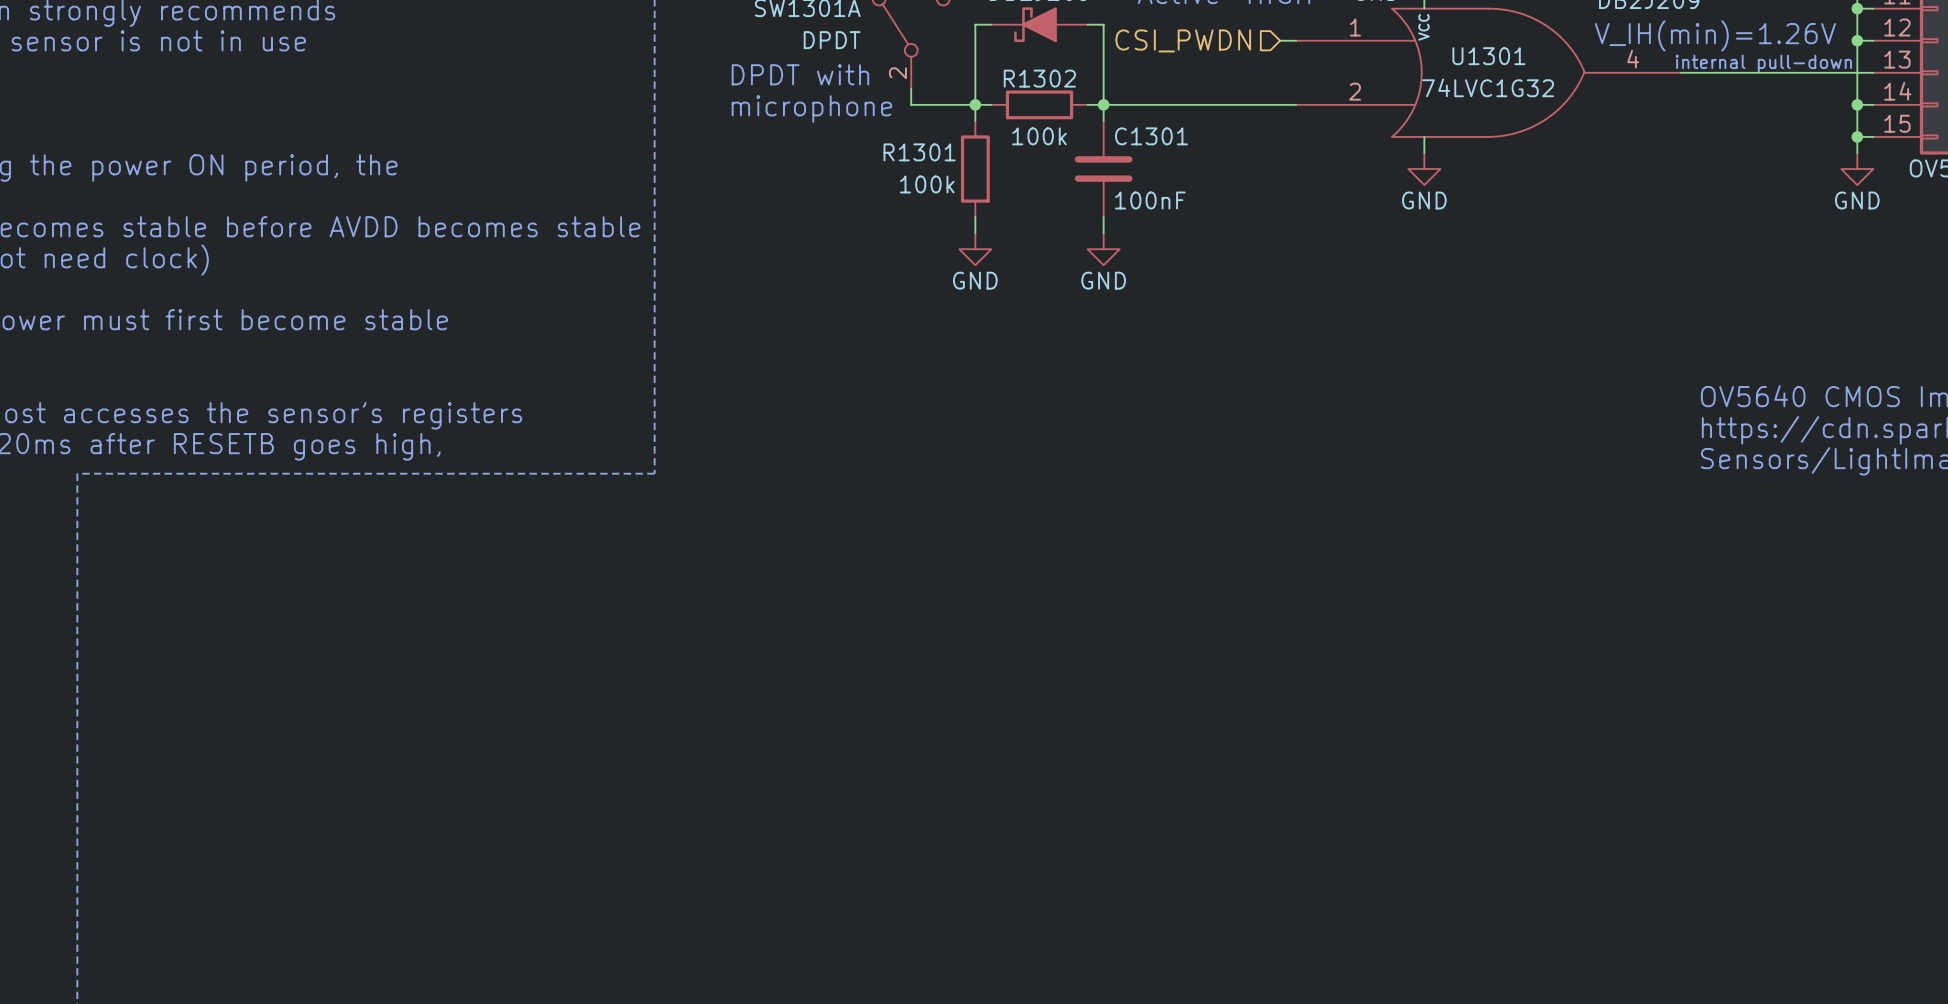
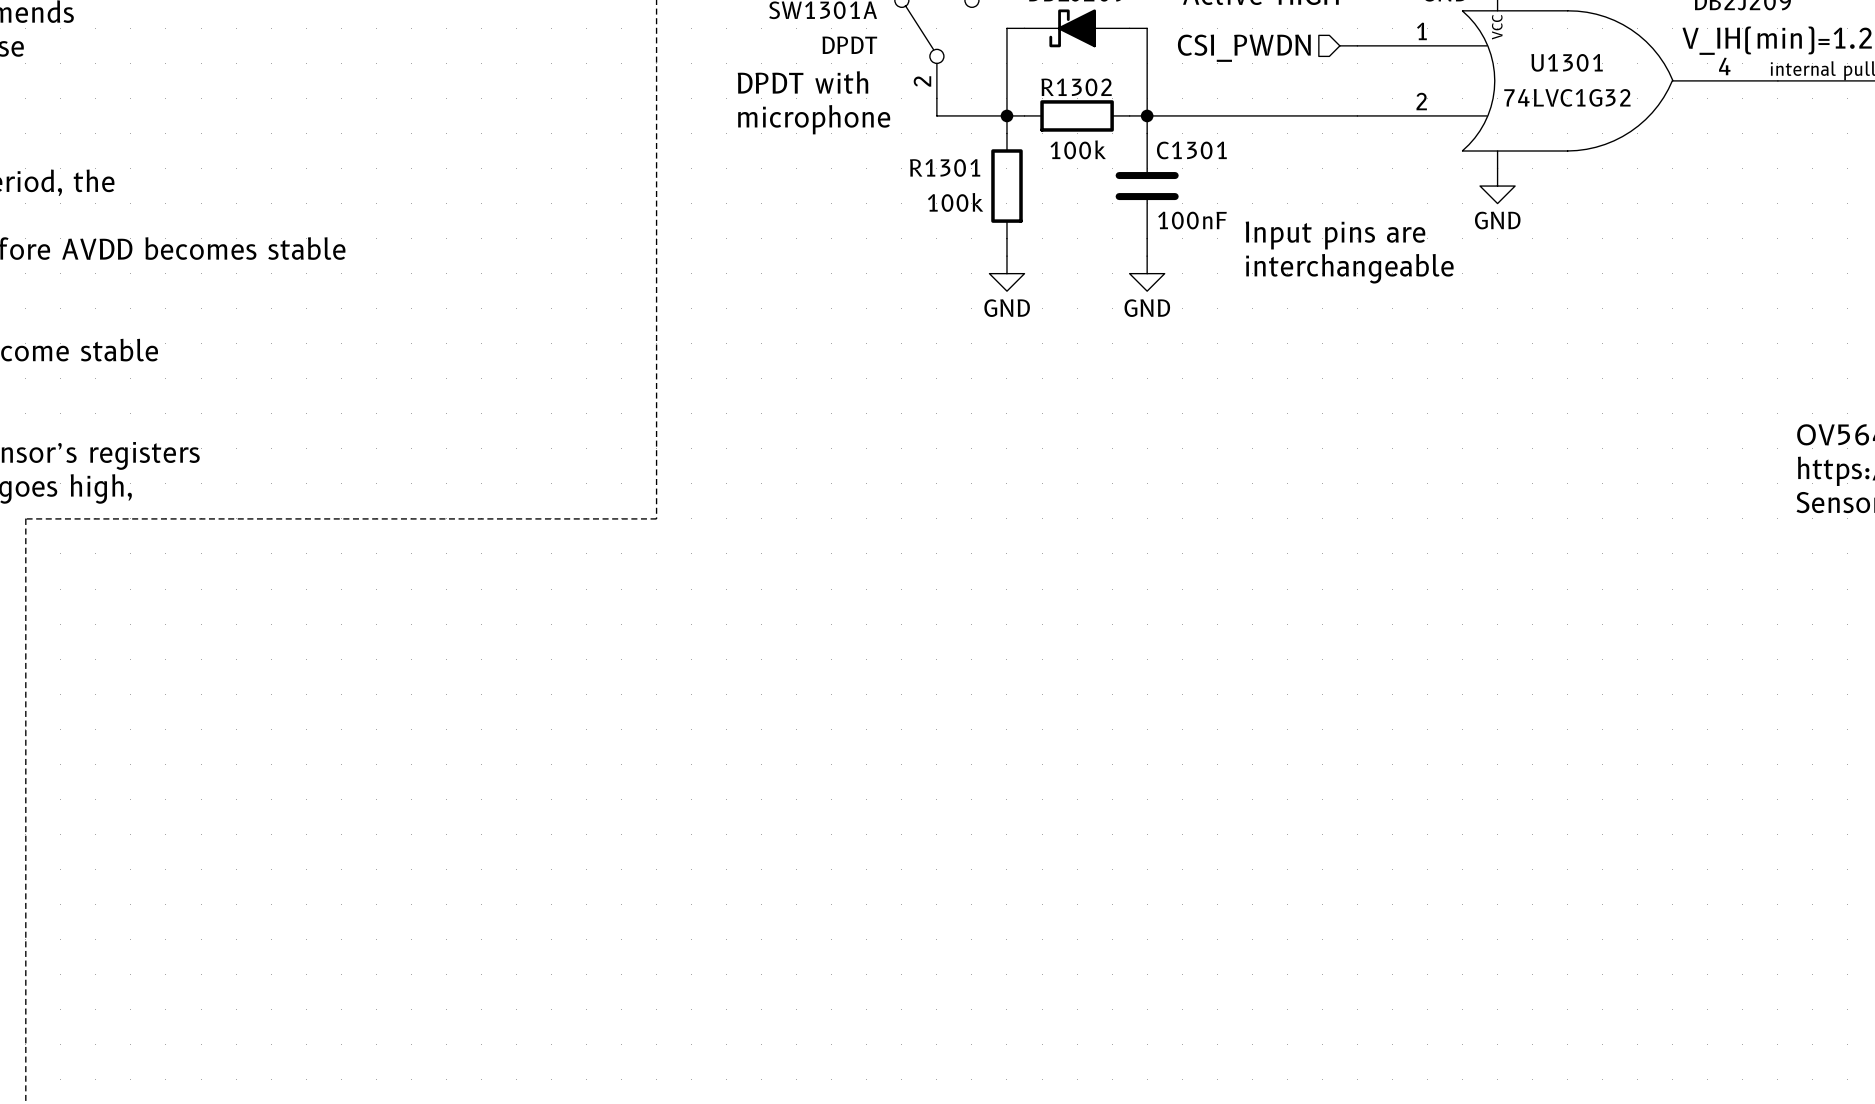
text: none -> Input pins are (1335, 235)
text: none -> interchangeable (1349, 268)

